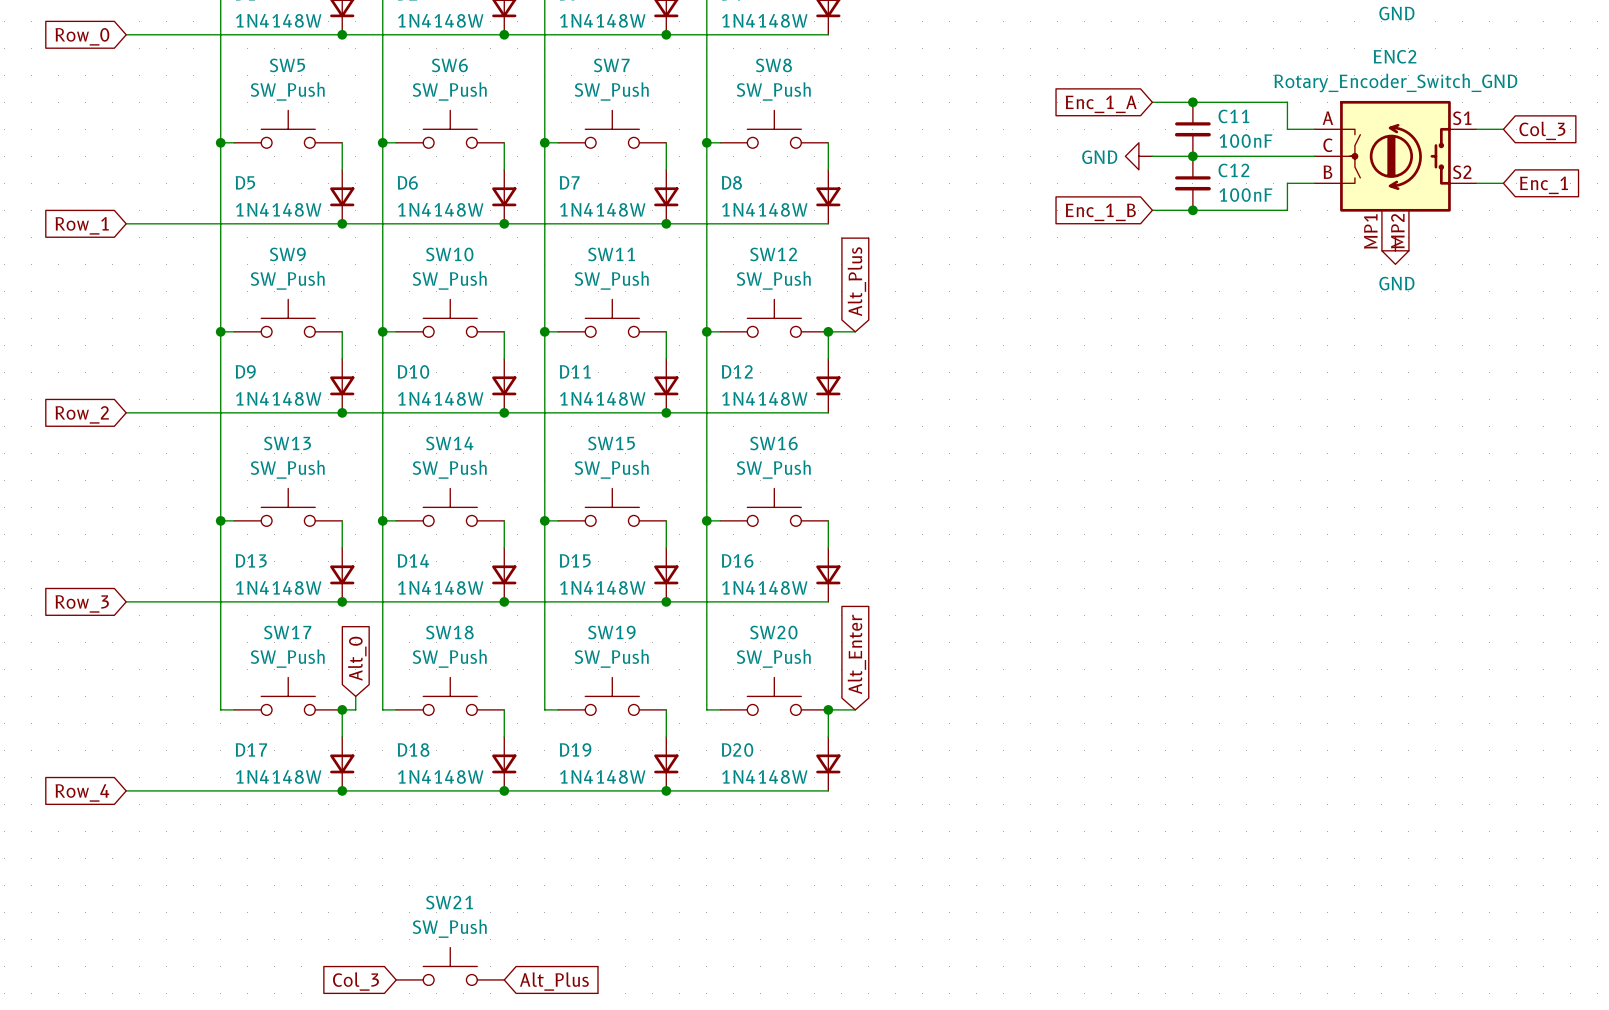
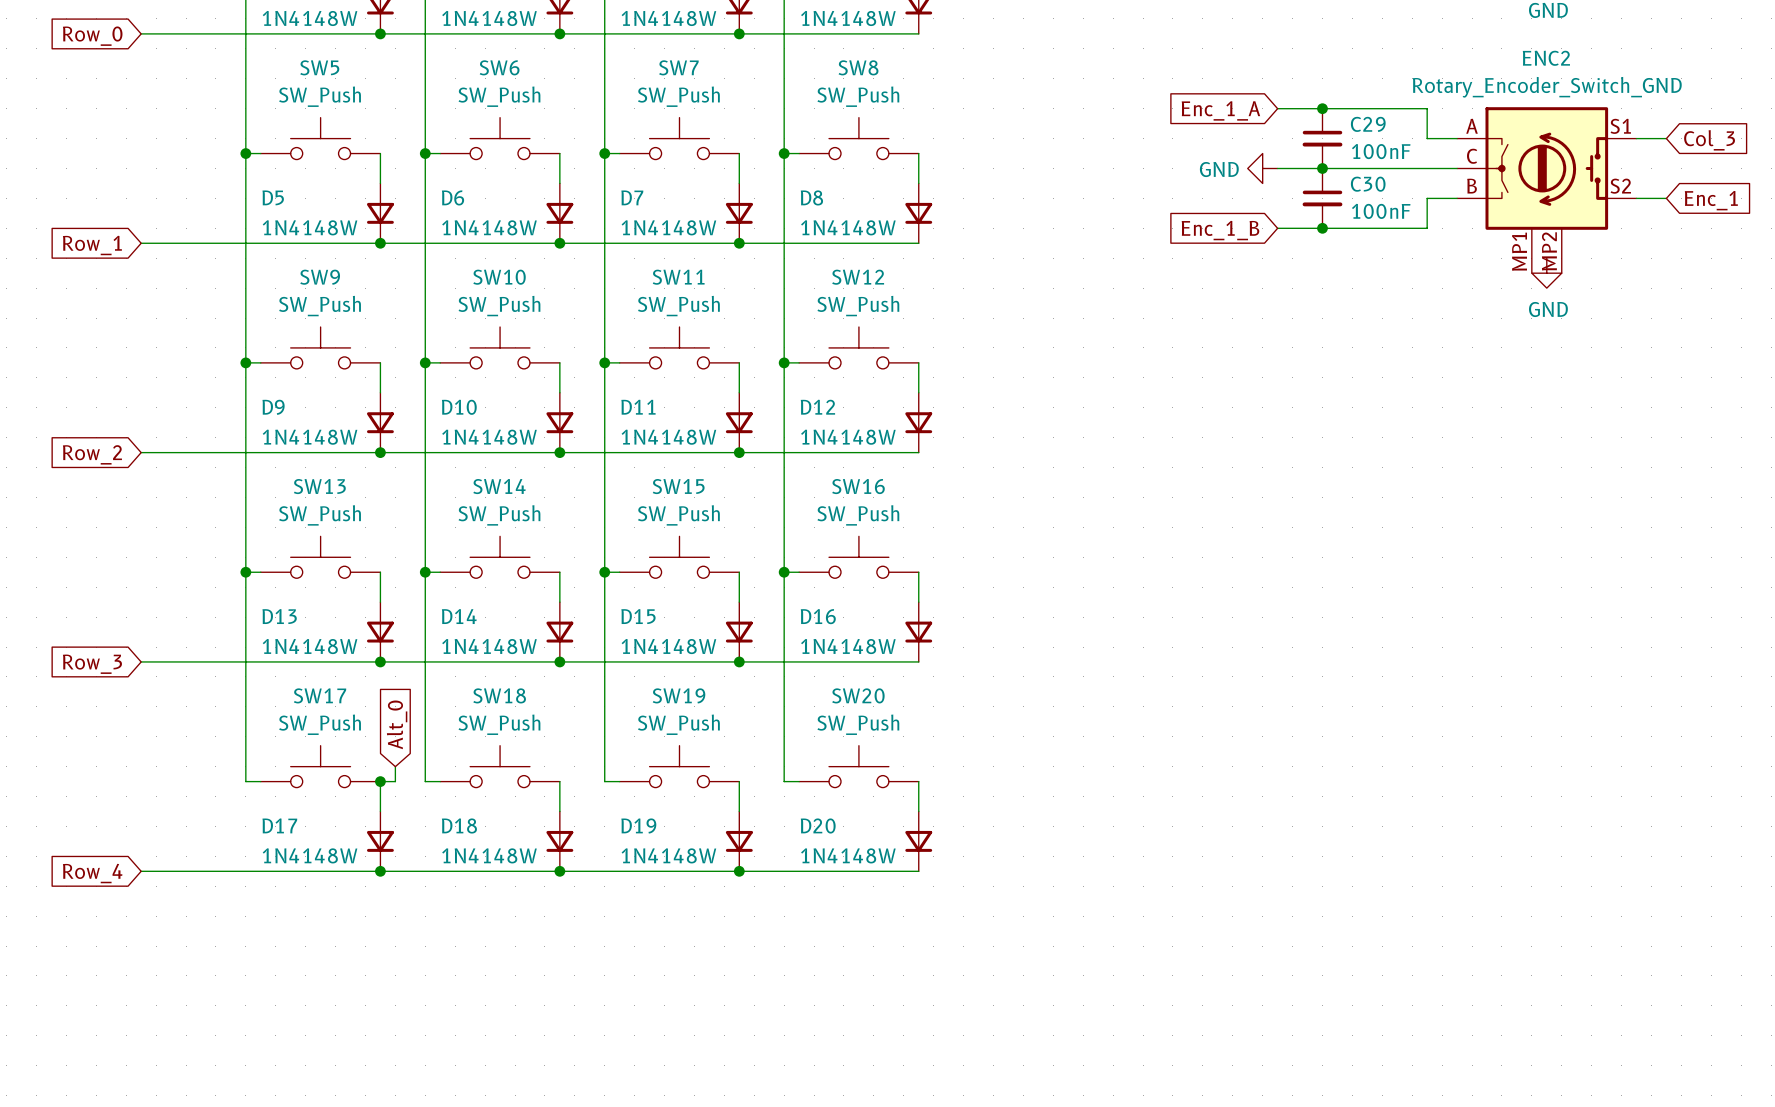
C11 name: C11 (1233, 116) -> C29 (1368, 124)
C12 name: C12 (1233, 170) -> C30 (1368, 184)
global label: Alt_Plus (856, 281) -> none
wire: (828, 331) (855, 331) -> none
junction: (828, 331) -> none
global label: Alt_Enter (856, 654) -> none
wire: (828, 709) (855, 709) -> none
junction: (828, 709) -> none
SW21: SW_Push (450, 966) -> none
global label: Col_3 (355, 981) -> none
global label: Alt_Plus (554, 981) -> none

